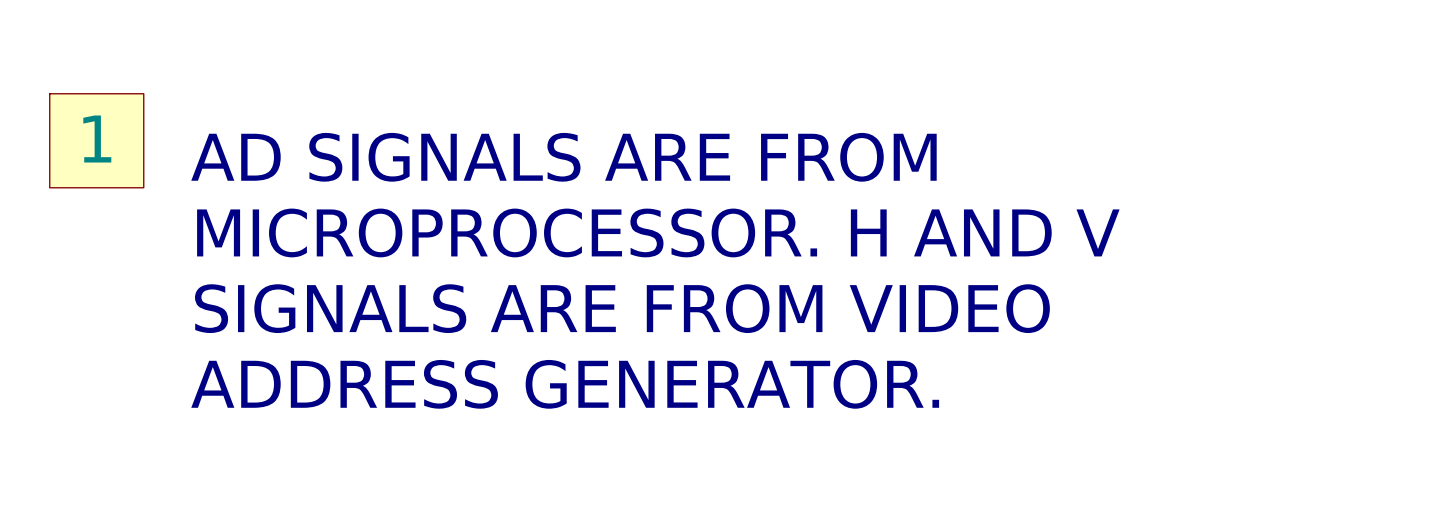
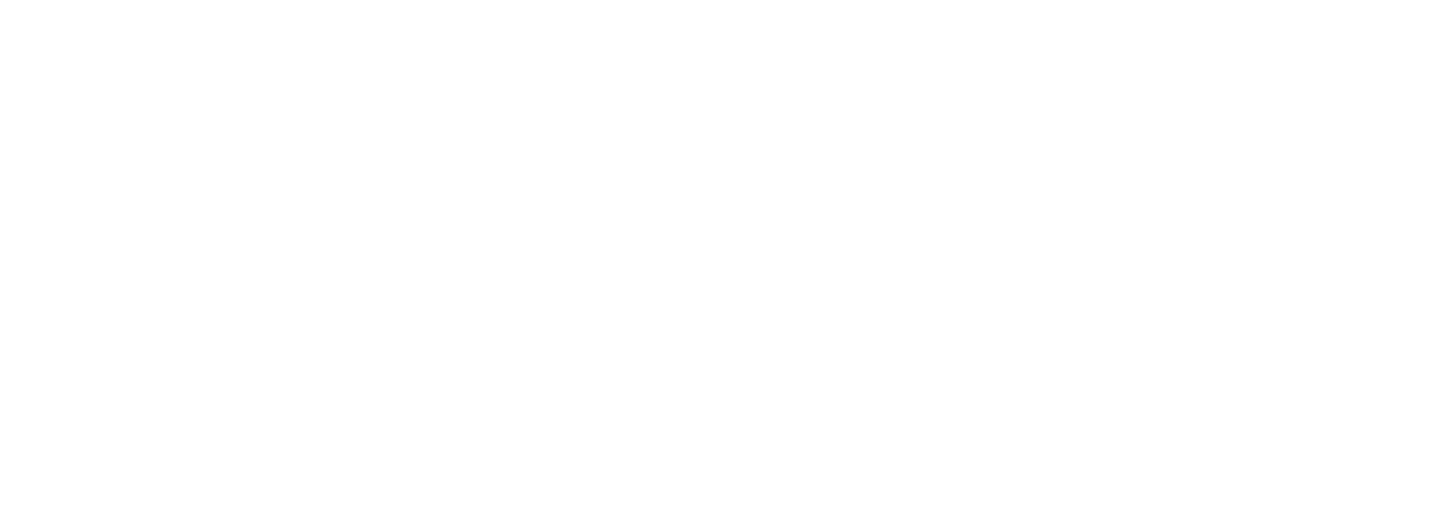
part: 1 (96, 140) -> none
text: AD SIGNALS ARE FROM (563, 157) -> none
text: MICROPROCESSOR. H AND V (658, 232) -> none
text: SIGNALS ARE FROM VIDEO (622, 308) -> none
text: ADDRESS GENERATOR. (565, 384) -> none

